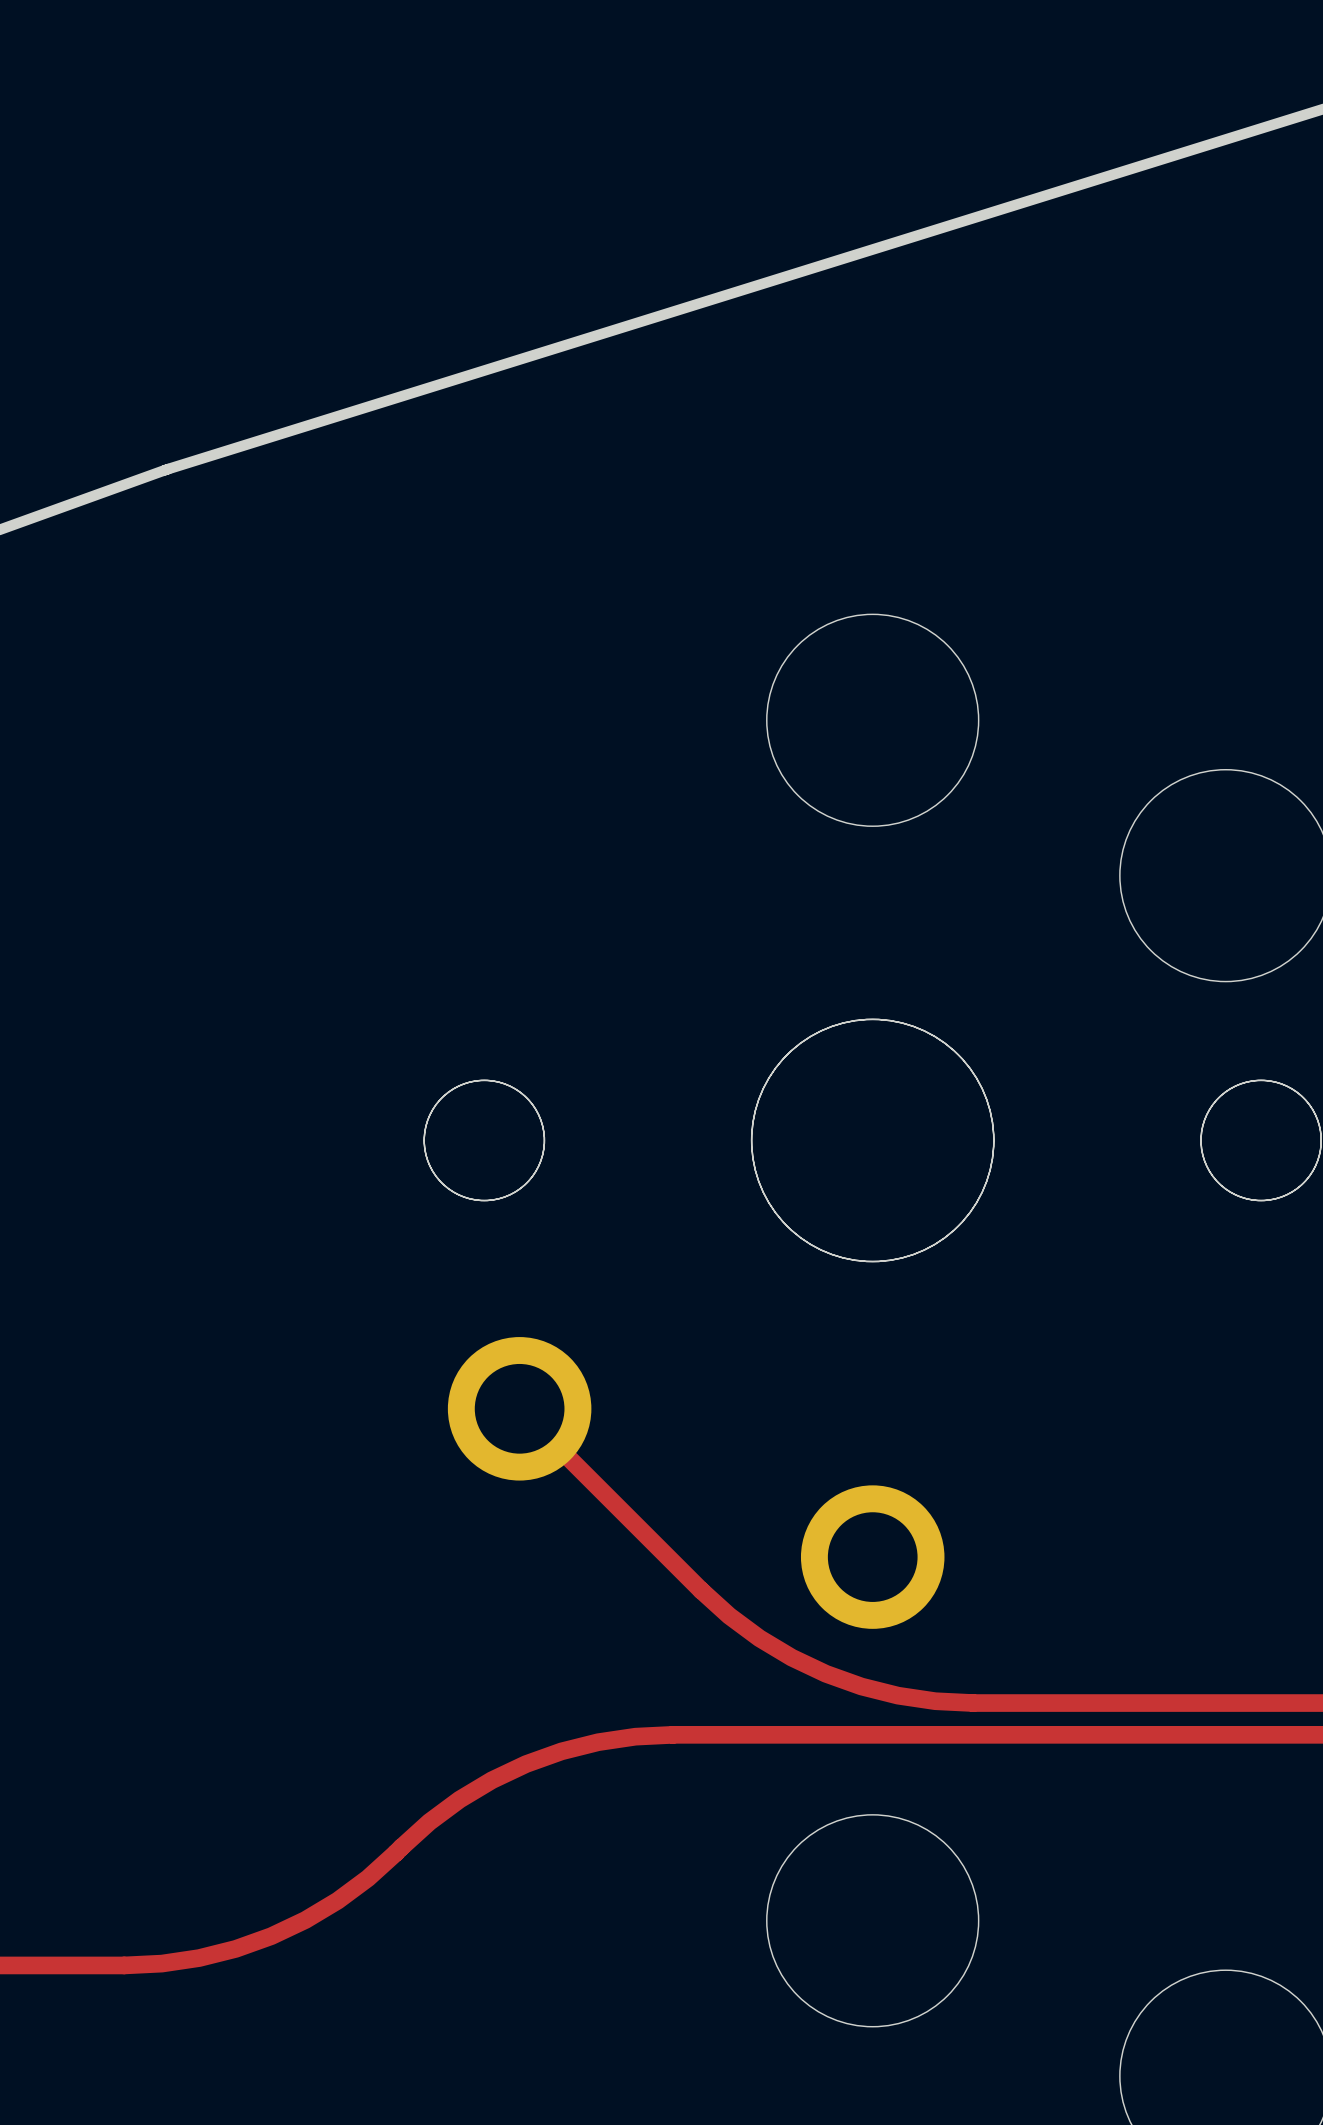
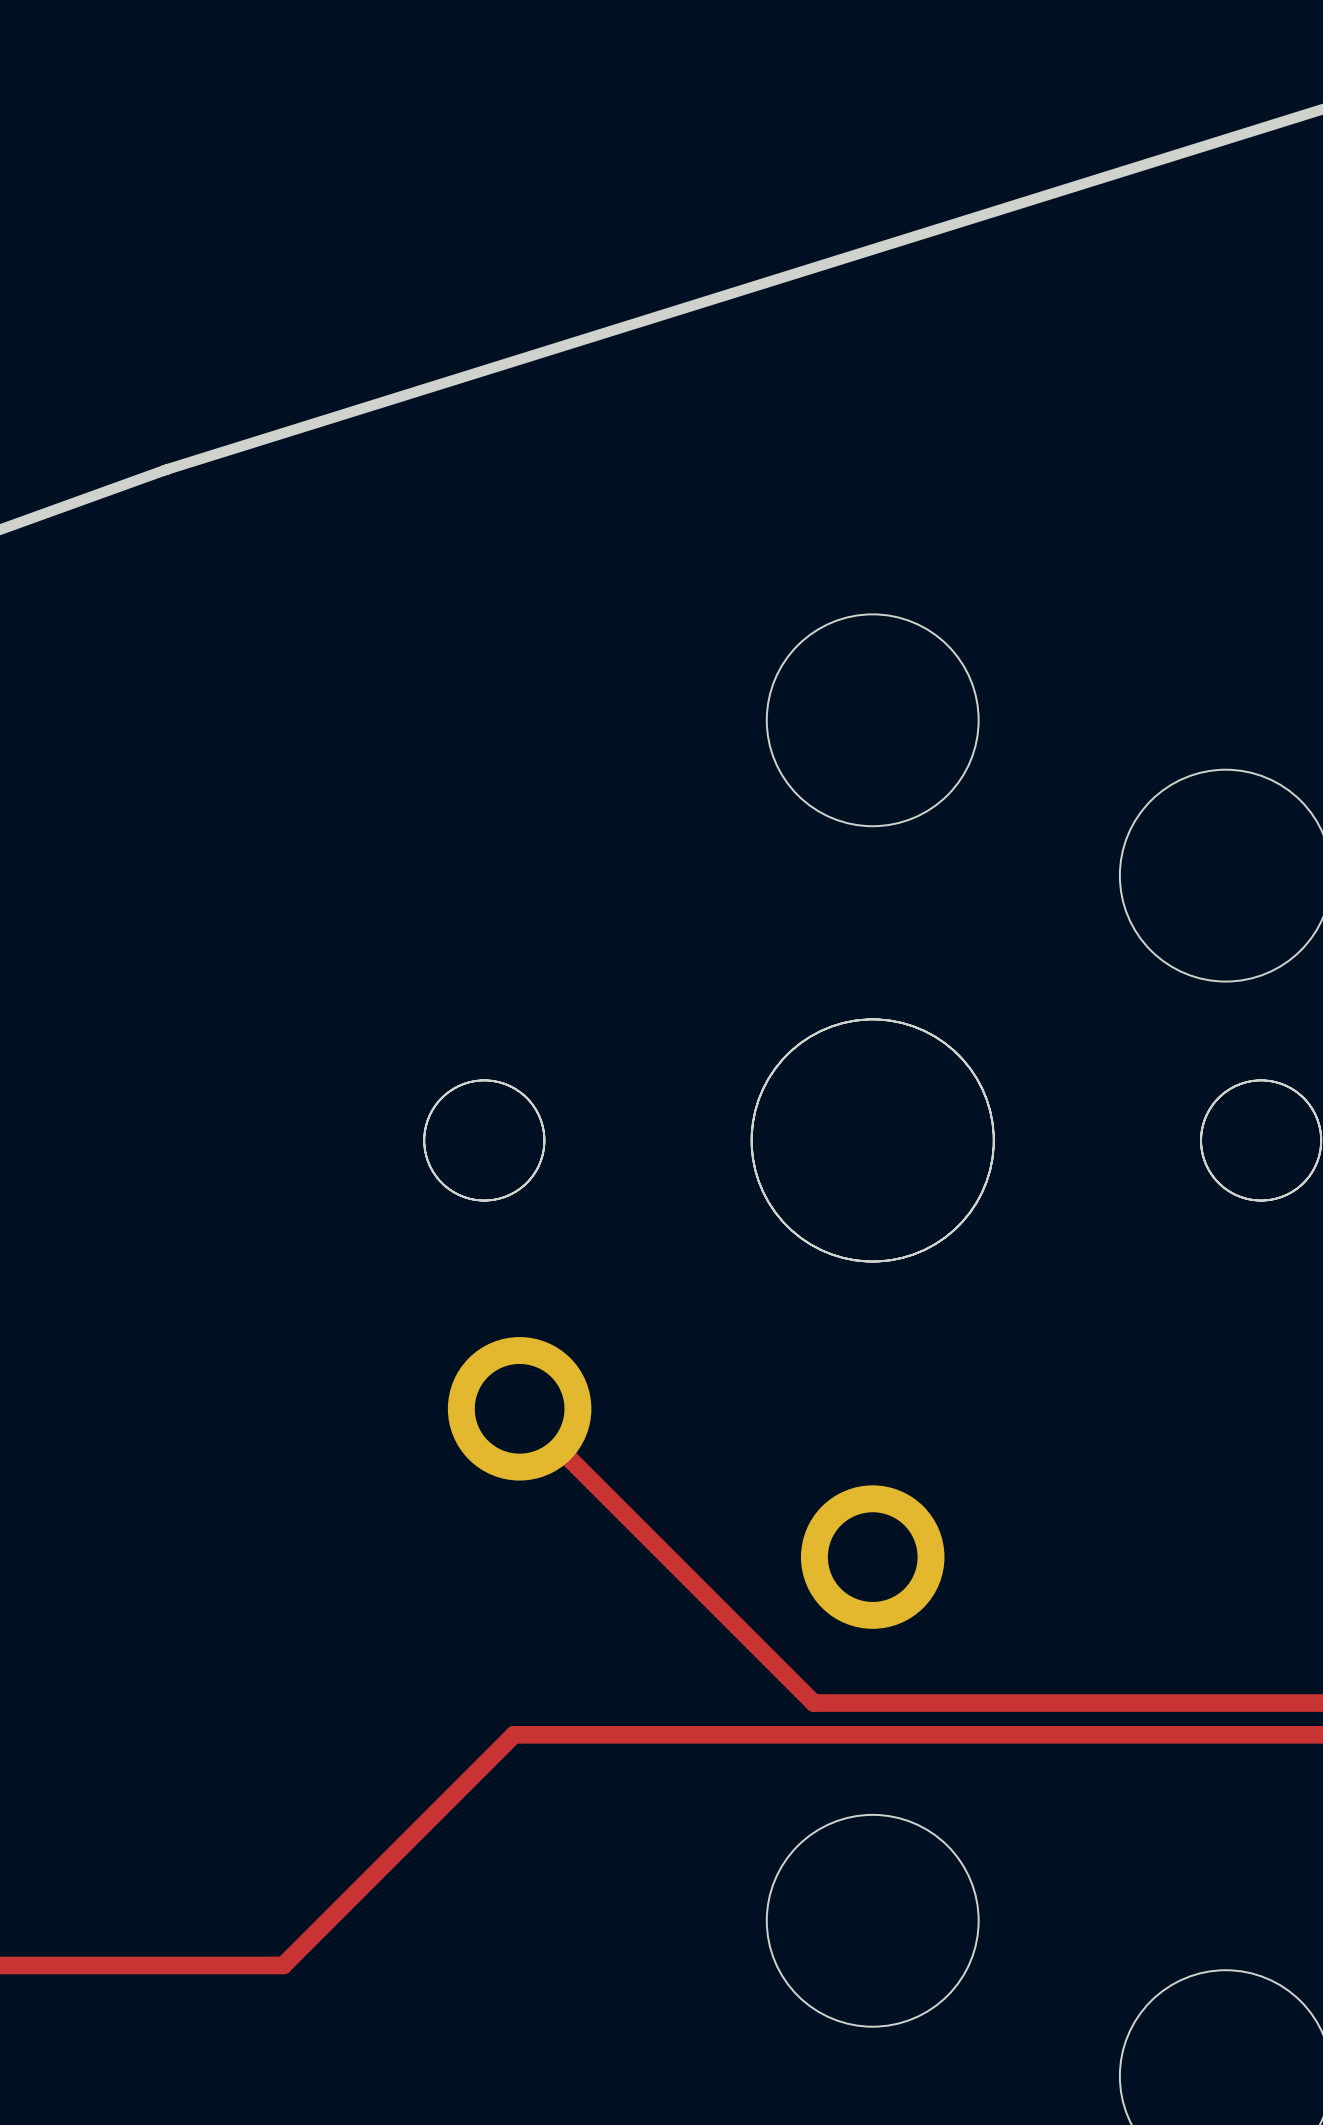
track: (701, 1590) (729, 1615) (759, 1638) (791, 1657) (825, 1673) (861, 1686) (898, 1695) (935, 1701) (973, 1703) -> (701, 1590) (813, 1703) (973, 1703)
track: (673, 1734) (635, 1736) (598, 1742) (561, 1751) (526, 1764) (492, 1780) (459, 1799) (429, 1822) (401, 1847) -> (673, 1734) (513, 1734) (401, 1847)
track: (395, 1852) (367, 1878) (337, 1900) (305, 1920) (271, 1936) (235, 1948) (199, 1958) (161, 1963) (124, 1965) -> (395, 1852) (283, 1965) (124, 1965)

